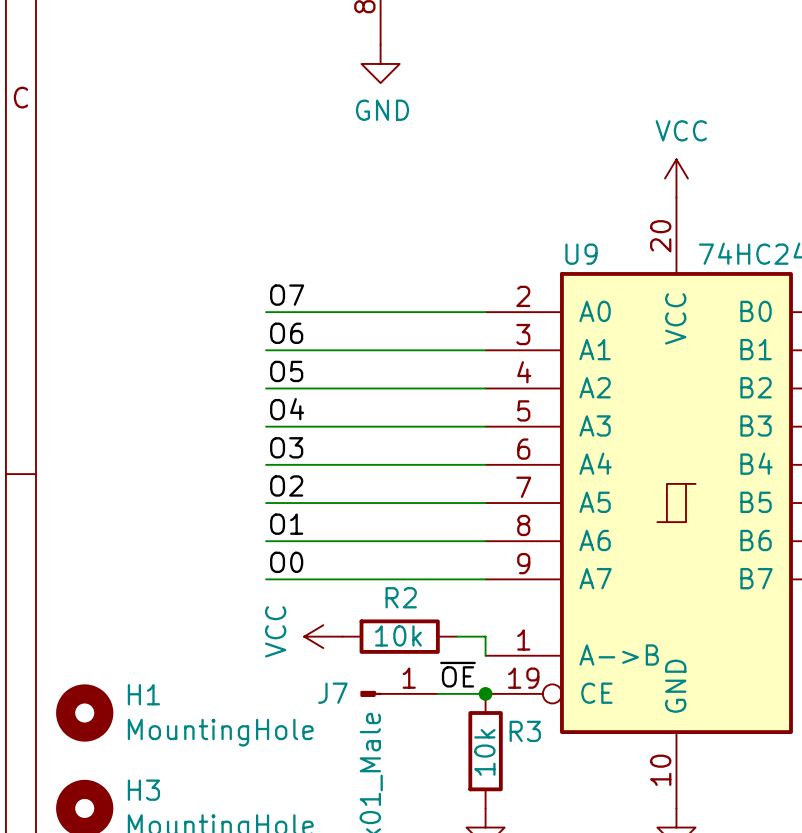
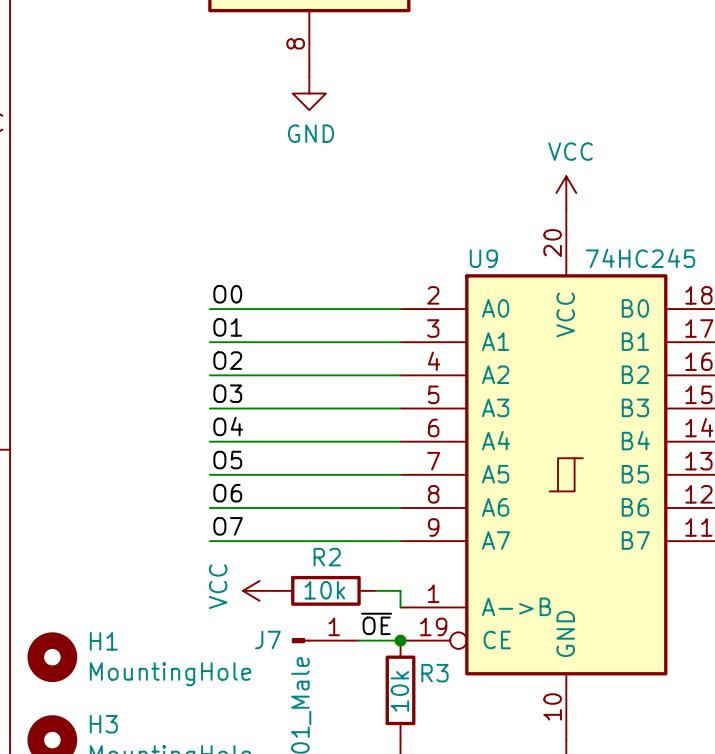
label: O7 (287, 295) -> O0 (227, 294)
label: O6 (286, 333) -> O1 (227, 327)
label: O5 (286, 371) -> O2 (227, 360)
label: O4 (287, 409) -> O3 (227, 393)
label: O3 (286, 447) -> O4 (228, 426)
label: O2 (286, 485) -> O5 (227, 460)
label: O1 (286, 524) -> O6 (227, 493)
label: O0 (286, 562) -> O7 (228, 526)

